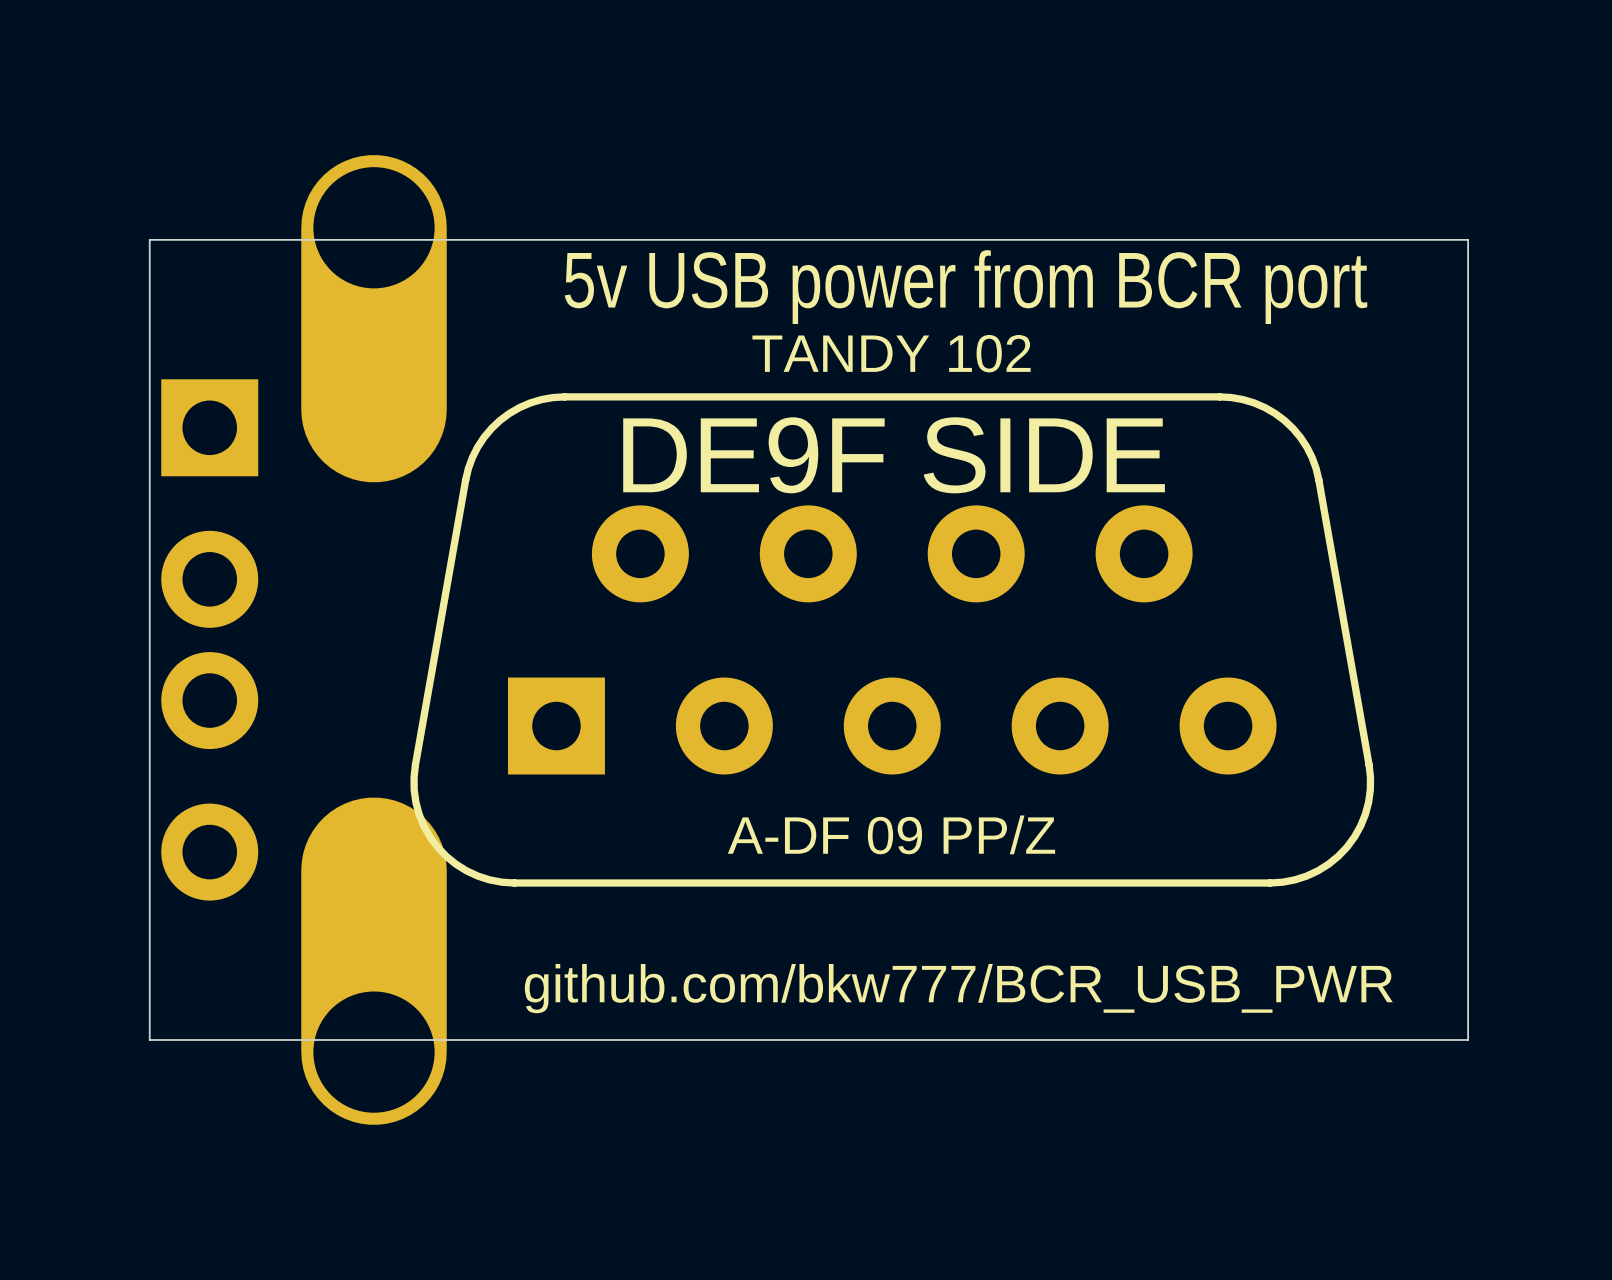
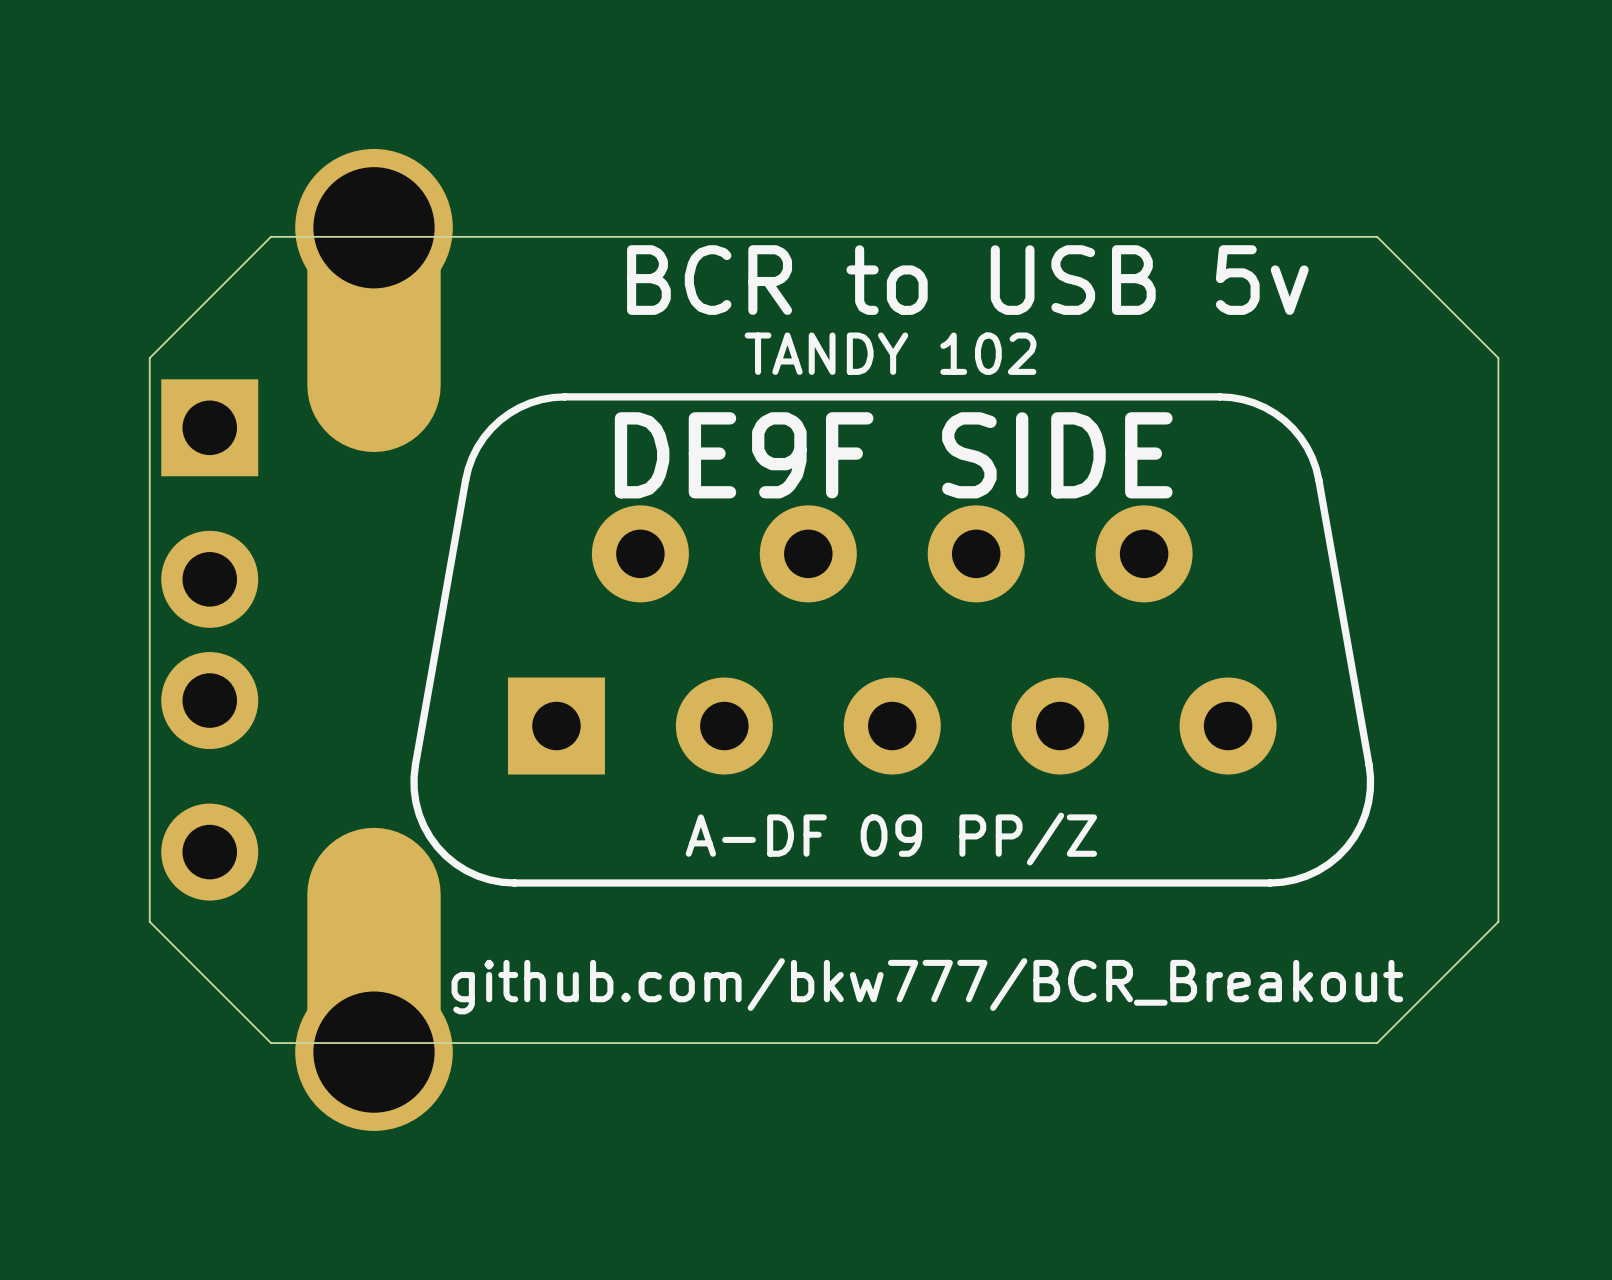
part footprint: [161, 155, 447, 1125] -> [161, 148, 453, 1131]
text: 5v USB power from BCR port (966, 287) -> BCR to USB 5v (967, 280)
board edge: (149, 358) (149, 239) (1468, 239) (1468, 1040) (149, 1040) (149, 921) -> (149, 358) (270, 236) (1377, 236) (1498, 358) (1498, 921) (1377, 1043) (270, 1043) (149, 921)
text: github.com/bkw777/BCR_USB_PWR (958, 988) -> github.com/bkw777/BCR_Breakout (927, 986)

